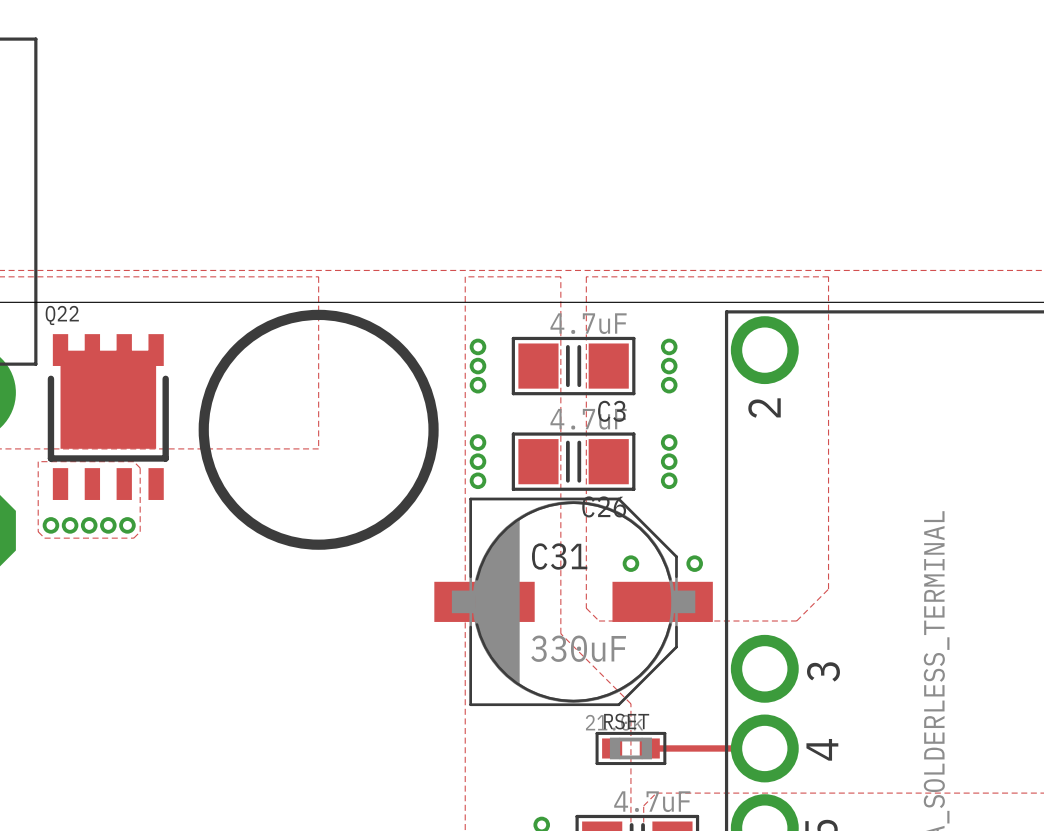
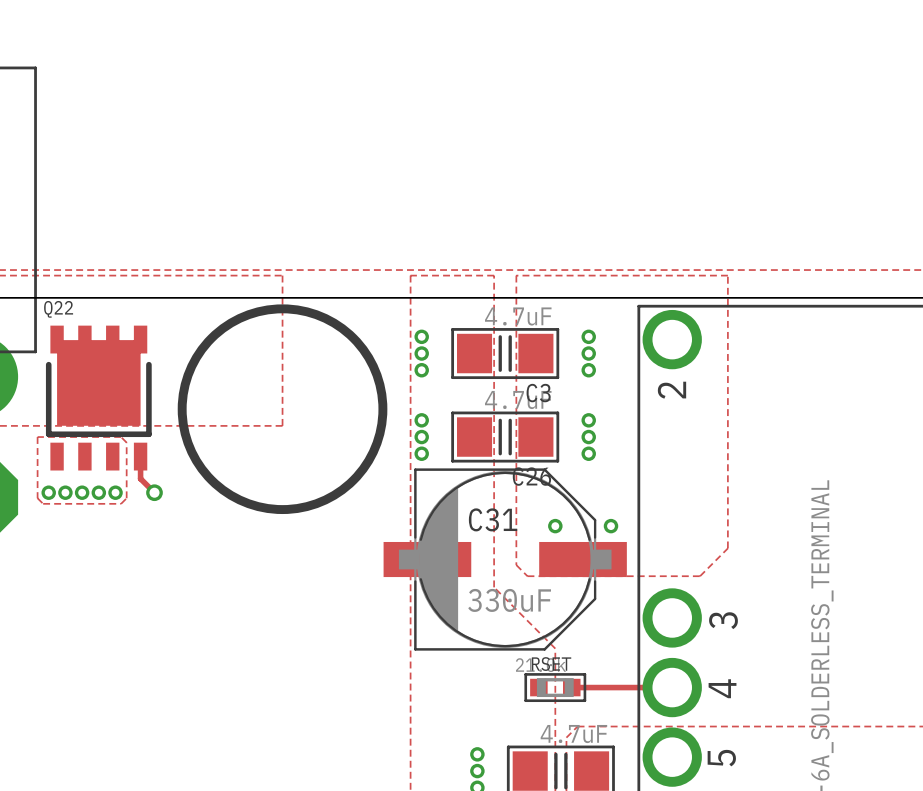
track: none -> (140, 456) (140, 478) (154, 492)
via: none -> (154, 492)

